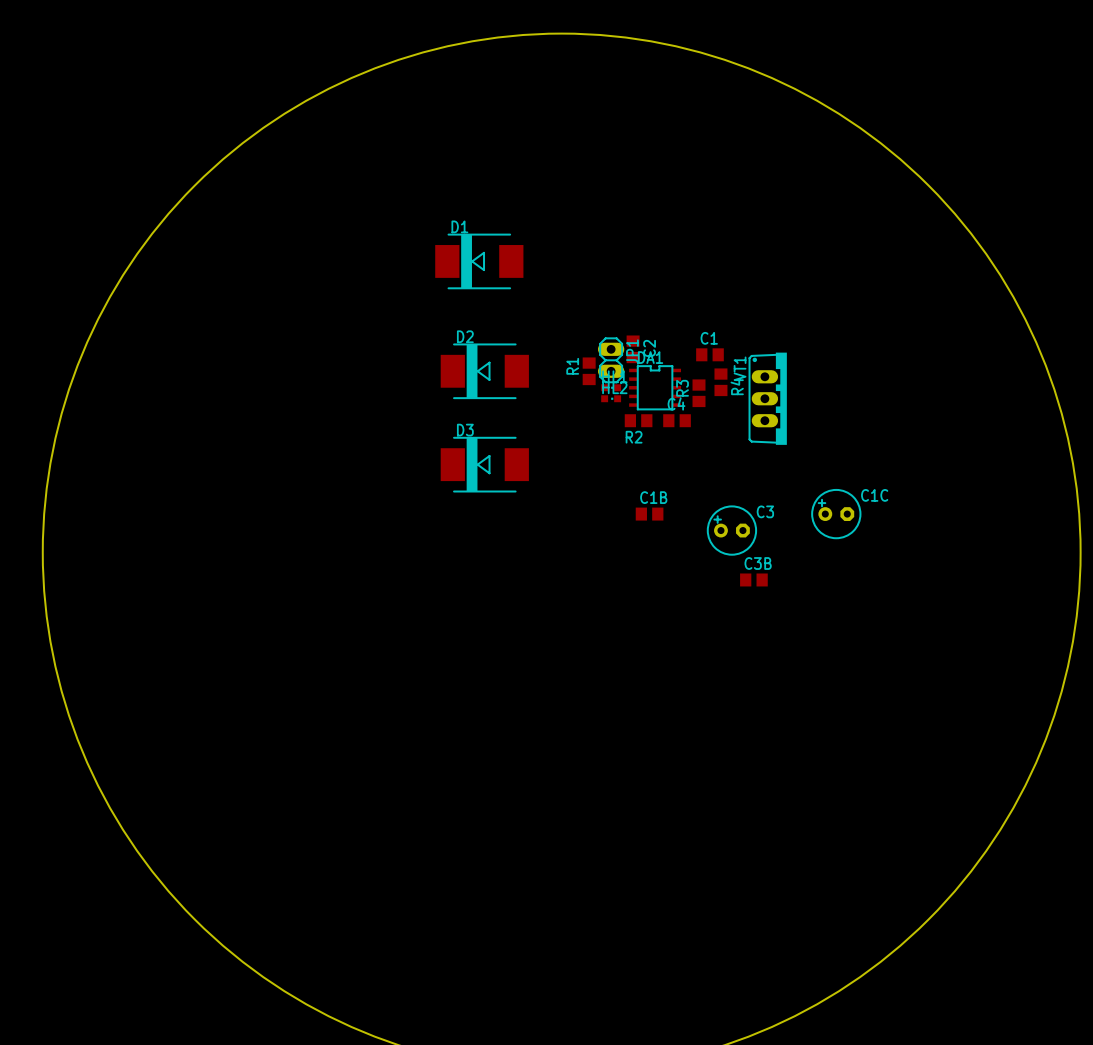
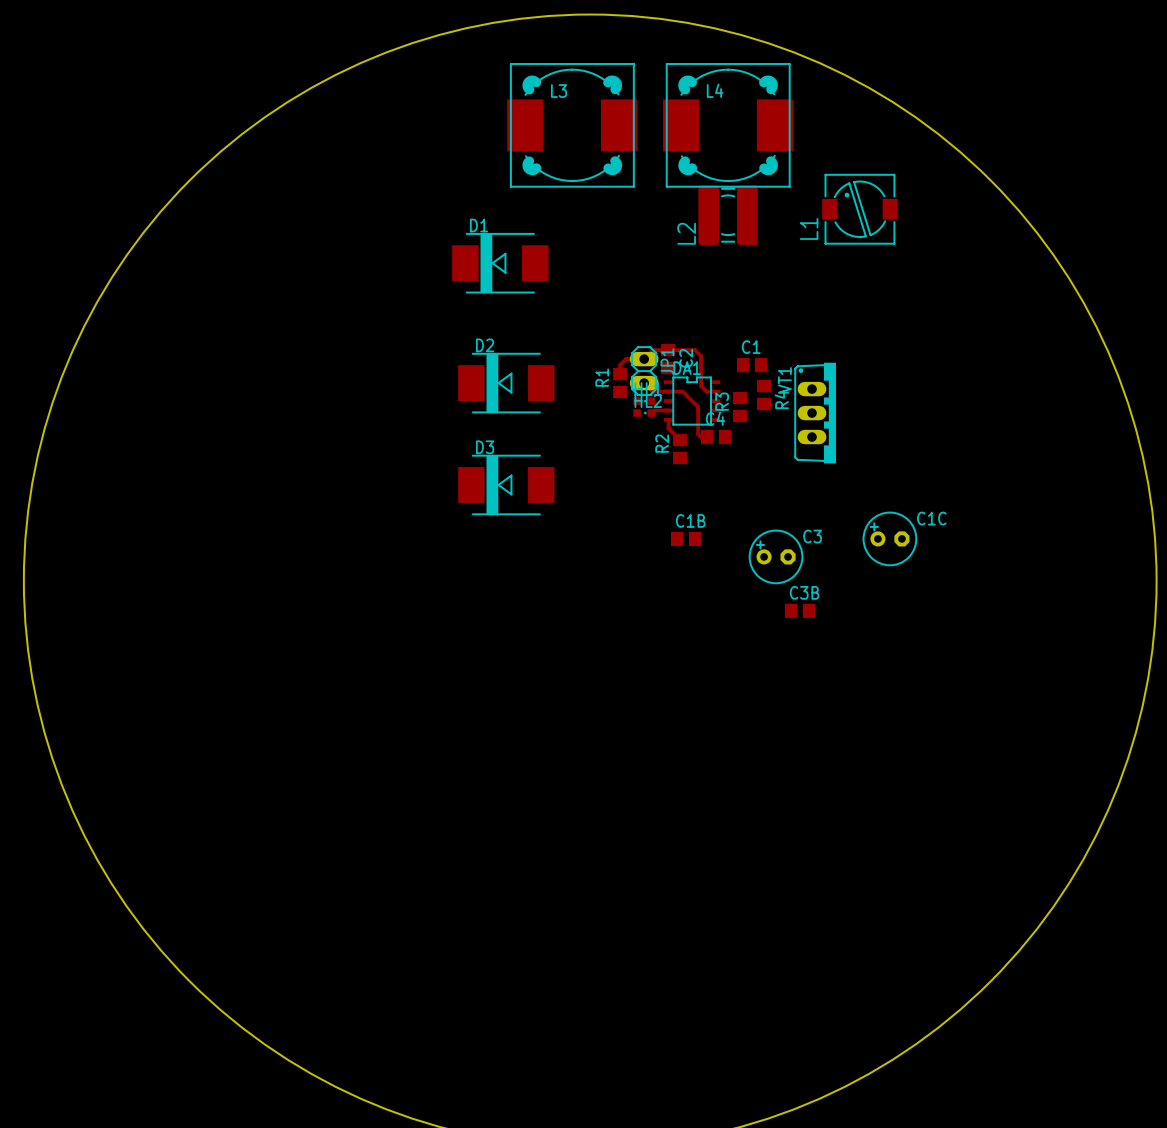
L3: none -> (572, 125)
L4: none -> (728, 125)
L1: none -> (859, 209)
L2: none -> (728, 215)
top track: none -> (620, 374) (620, 365) (626, 359) (644, 359) (653, 350) (695, 350) (701, 356) (701, 386) (706, 391) (715, 391)
top track: none -> (644, 383) (652, 391) (682, 391) (698, 407) (698, 434) (704, 440)
top track: none -> (668, 410) (653, 410) (651, 413)
top track: none -> (668, 419) (668, 428) (680, 440)
R2 rotation: 0° (638, 420) -> 90° clockwise (680, 449)

